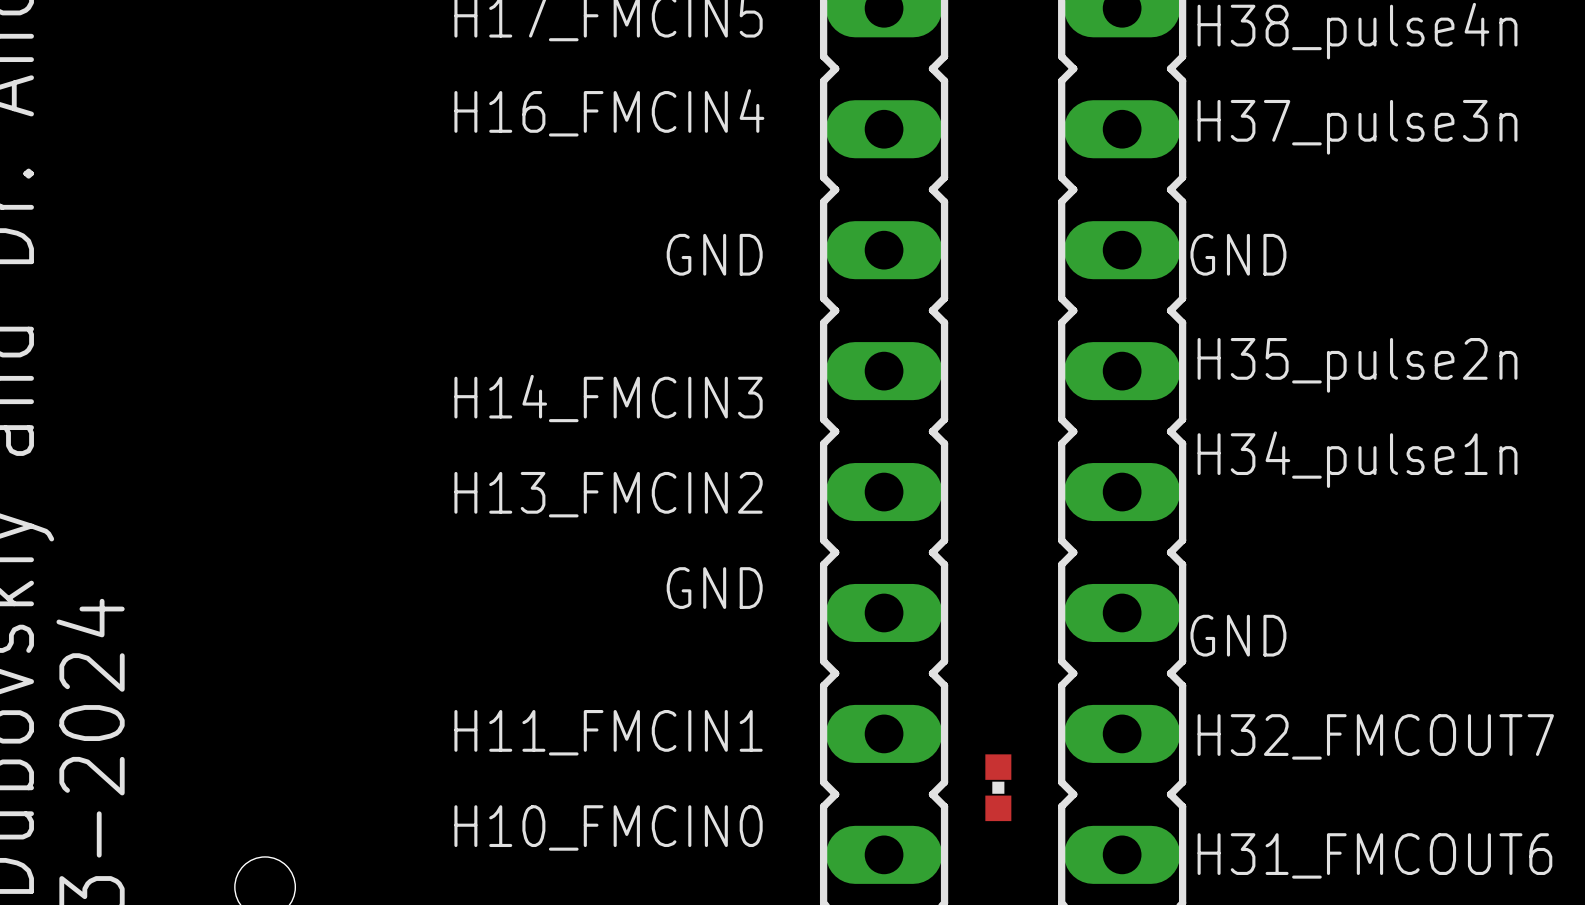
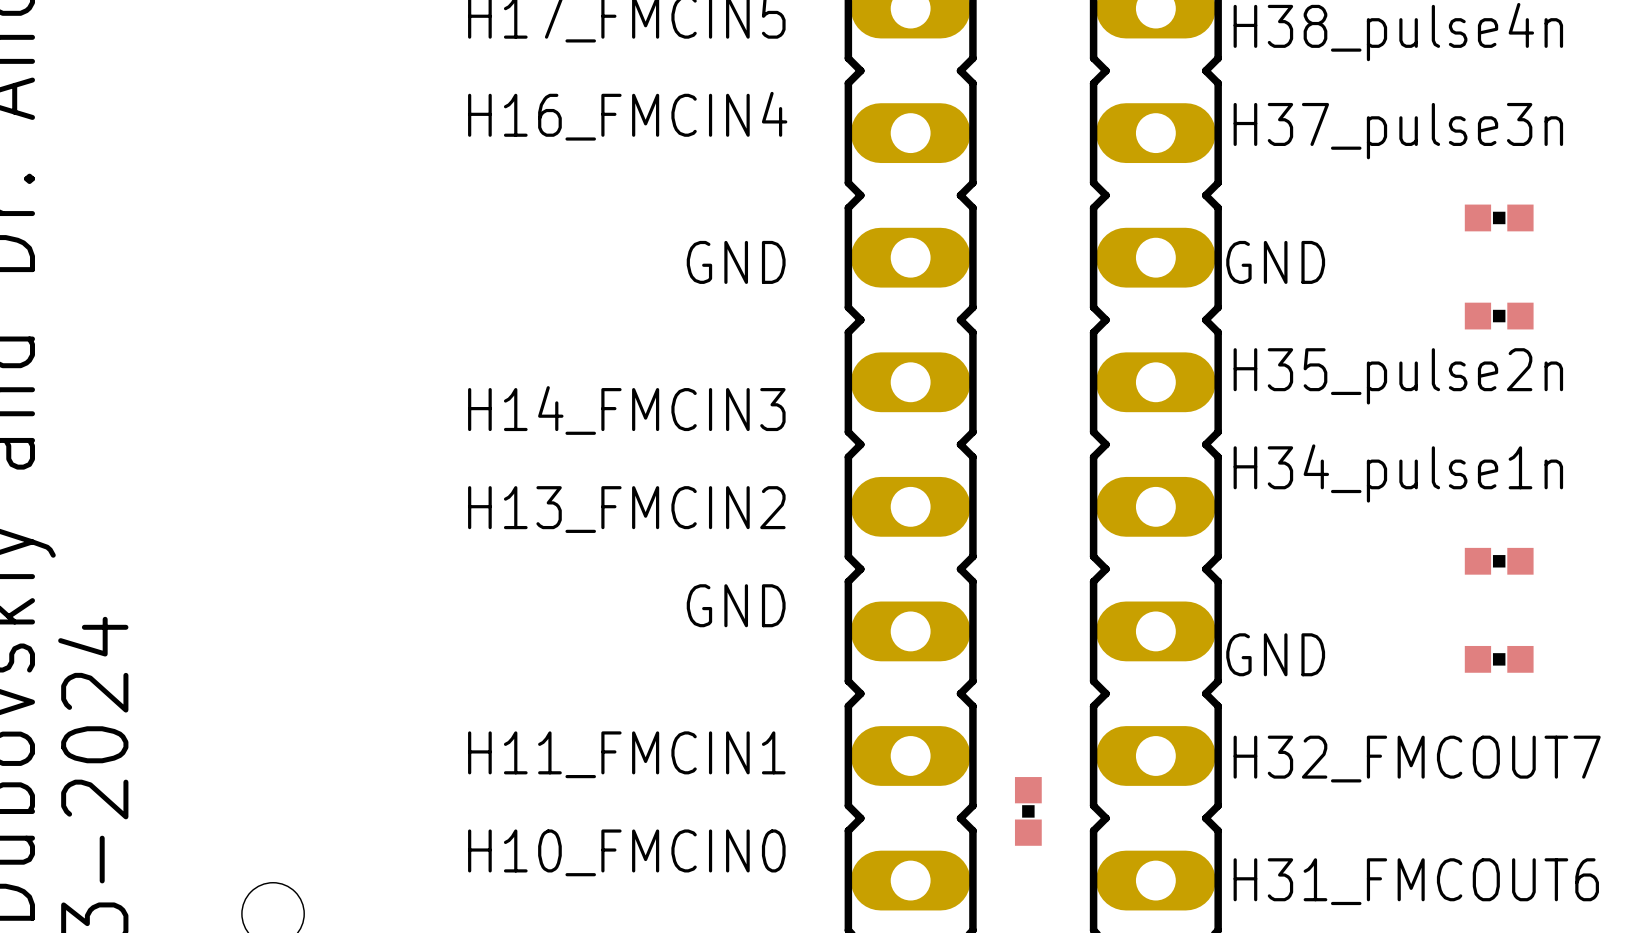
part: none -> (1499, 217)
part: none -> (1499, 316)
part: none -> (1499, 561)
part: none -> (1499, 659)

